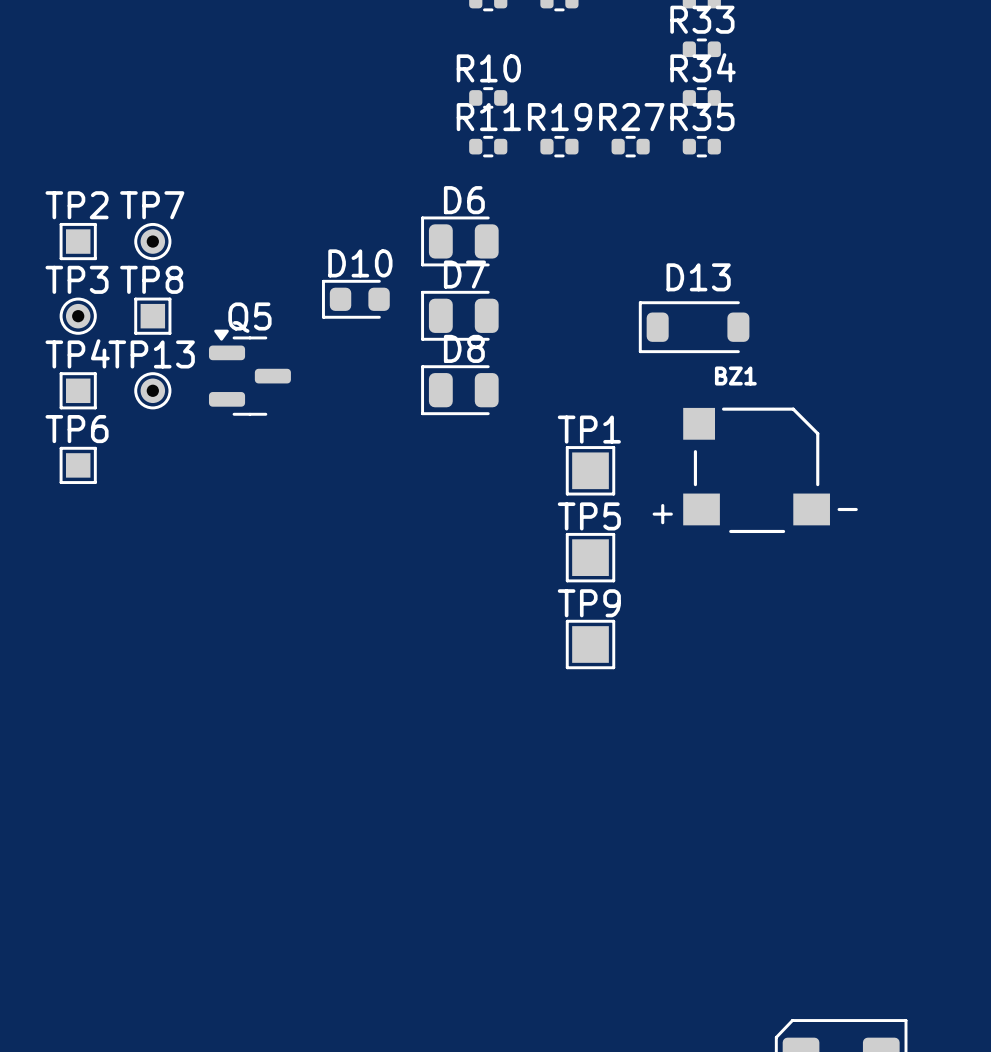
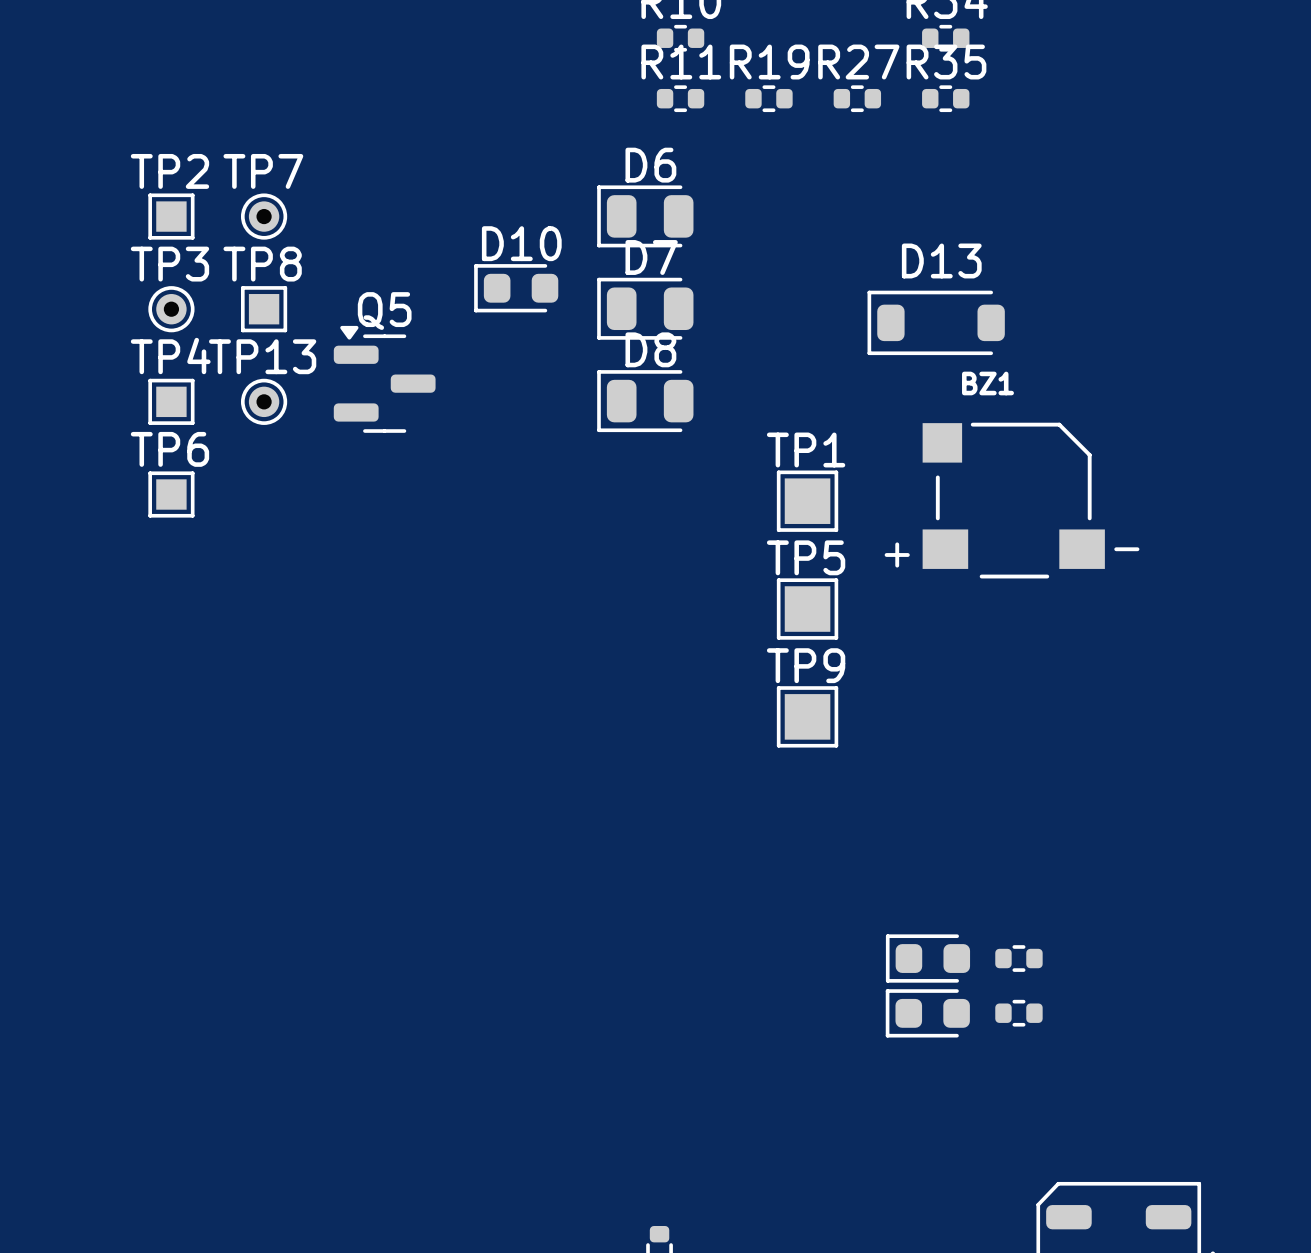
part: none -> (927, 958)
part: none -> (1018, 958)
part: none -> (927, 1013)
part: none -> (1018, 1013)

